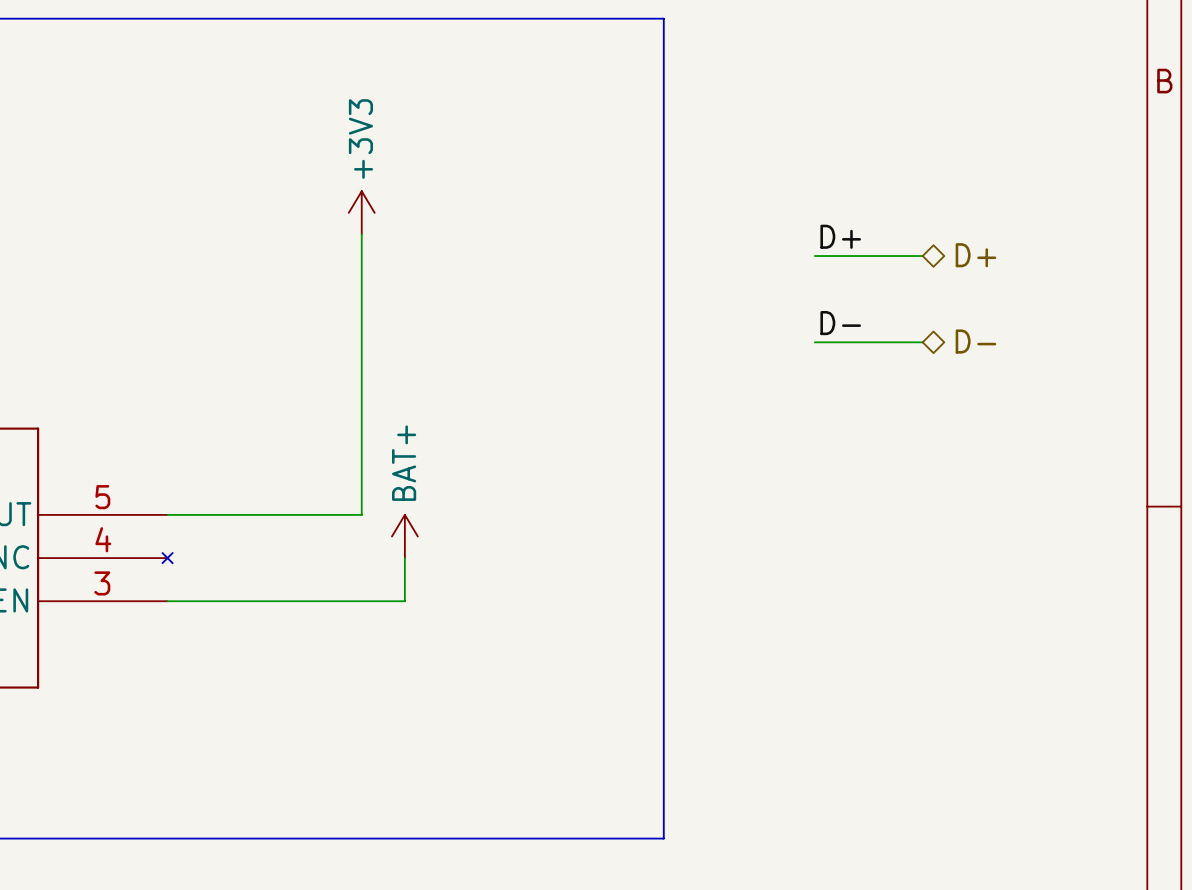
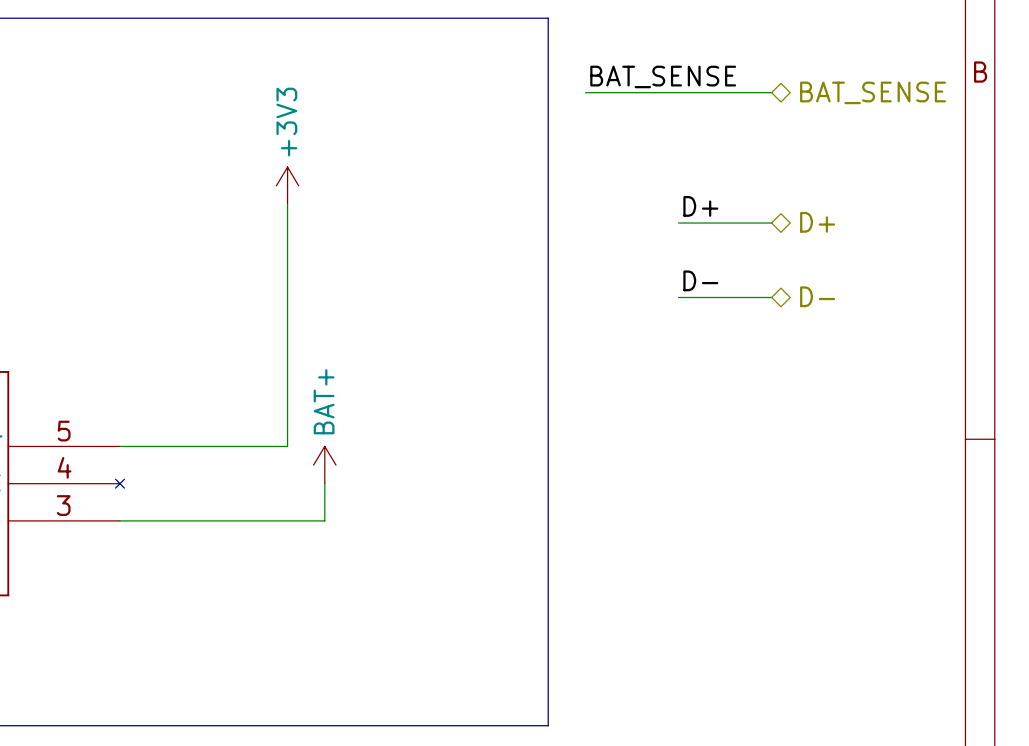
label: none -> BAT_SENSE (663, 76)
wire: none -> (585, 92) (771, 92)
hierarchical label: none -> BAT_SENSE (873, 92)

